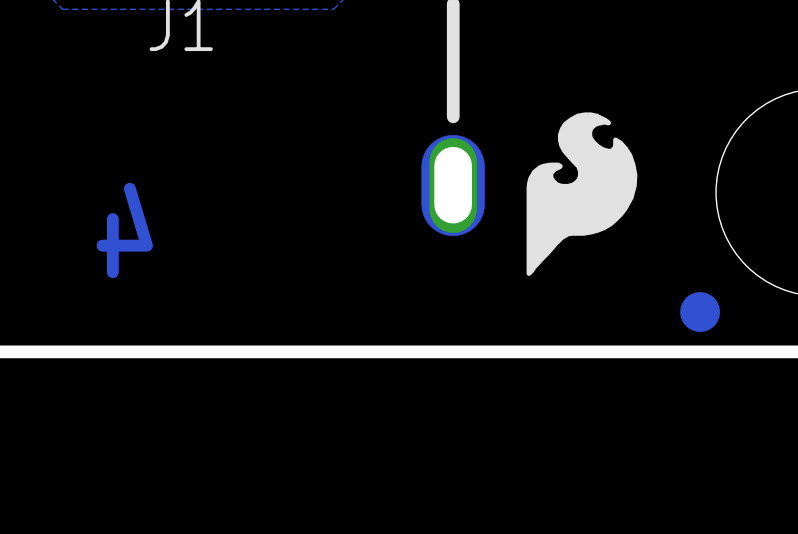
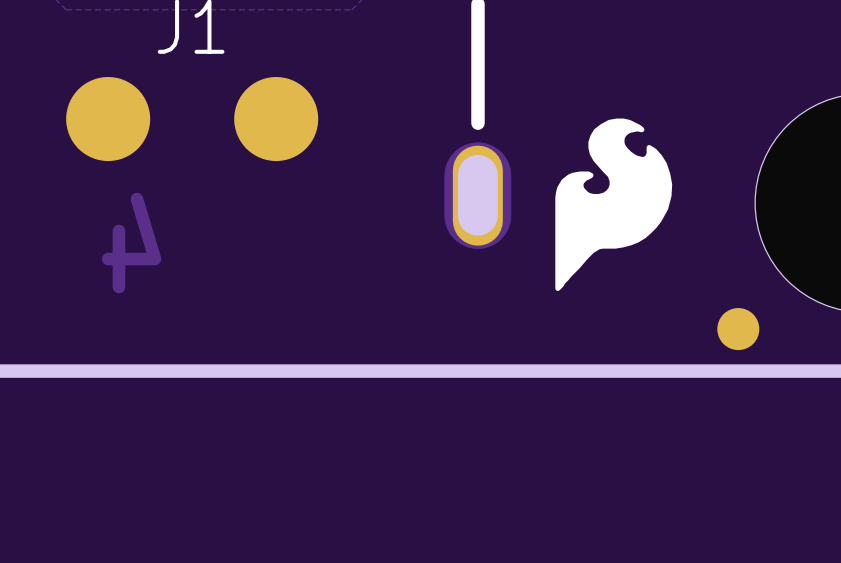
part: none -> (108, 119)
part: none -> (276, 119)

